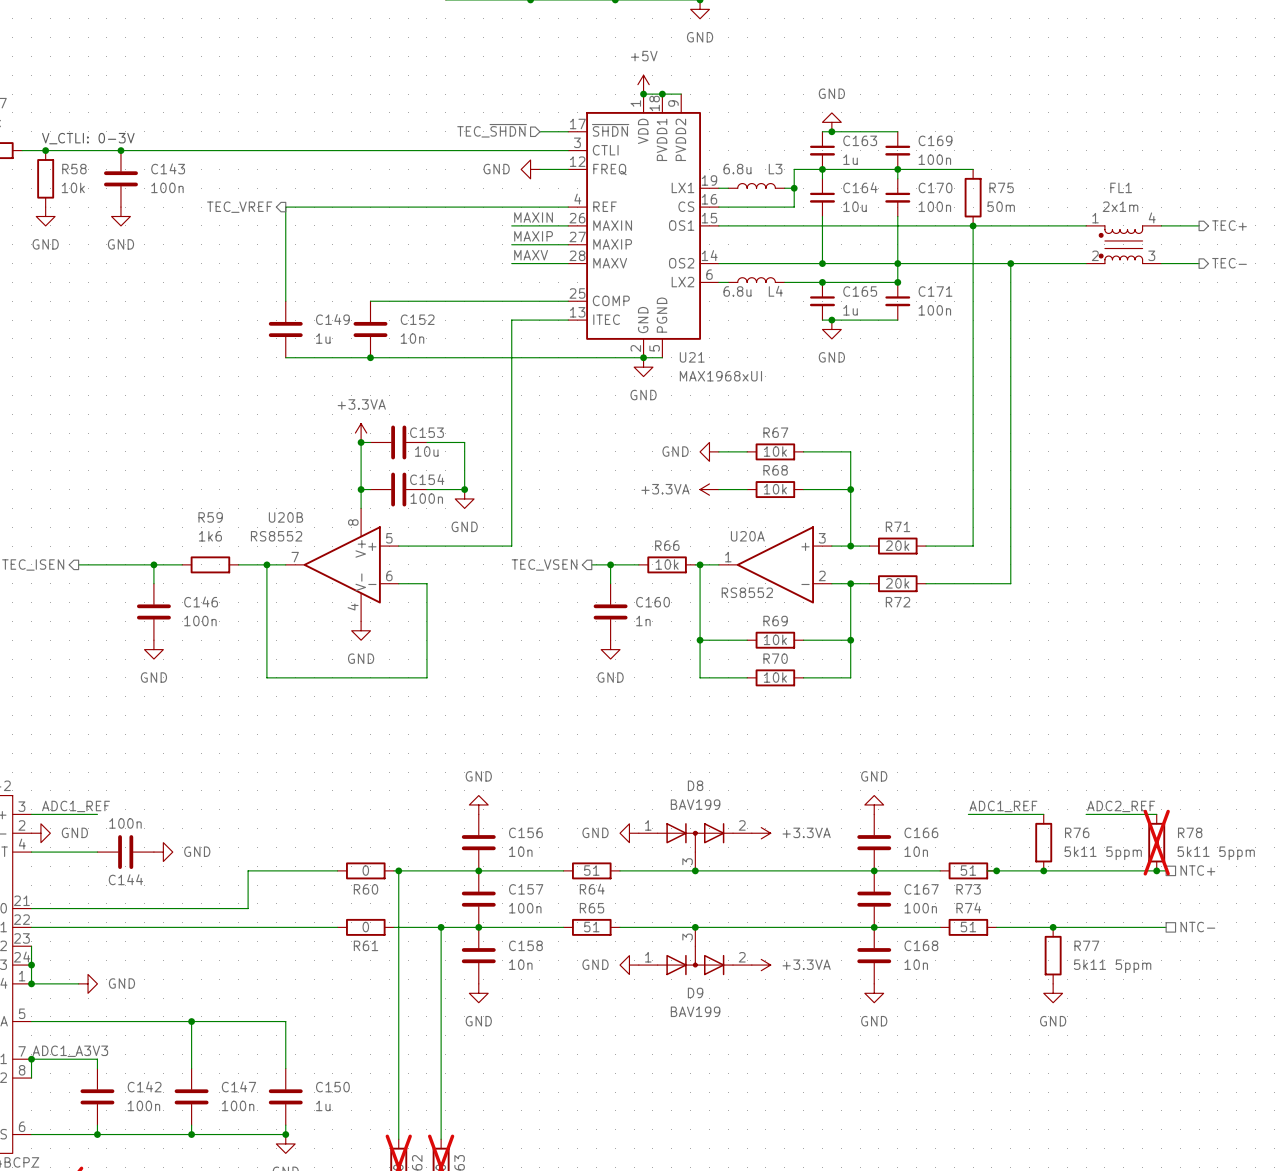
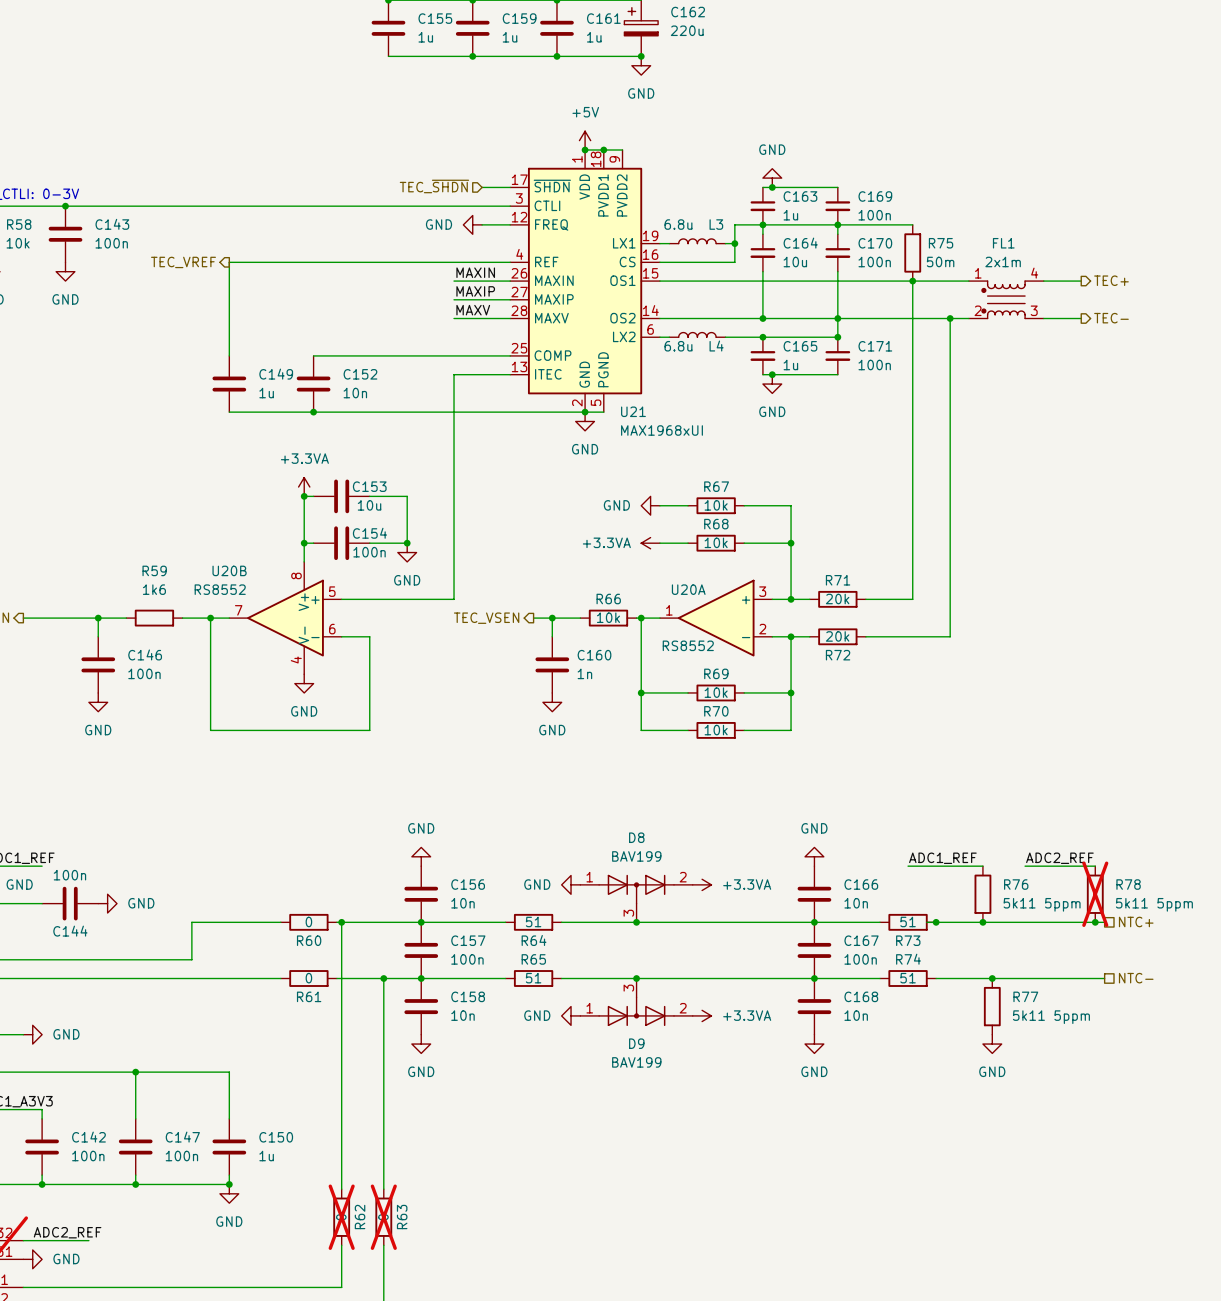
wire: (1029, 225) (1086, 225) -> none
wire: (1161, 225) (1199, 225) -> (1043, 281) (1081, 281)
hierarchical label position: TEC+ (1229, 225) -> TEC+ (1111, 280)
FL1 position: (1123, 244) -> (1006, 299)
wire: (1029, 263) (1086, 263) -> none
wire: (1161, 263) (1199, 263) -> (1043, 318) (1081, 318)
hierarchical label position: TEC- (1229, 263) -> TEC- (1111, 318)

